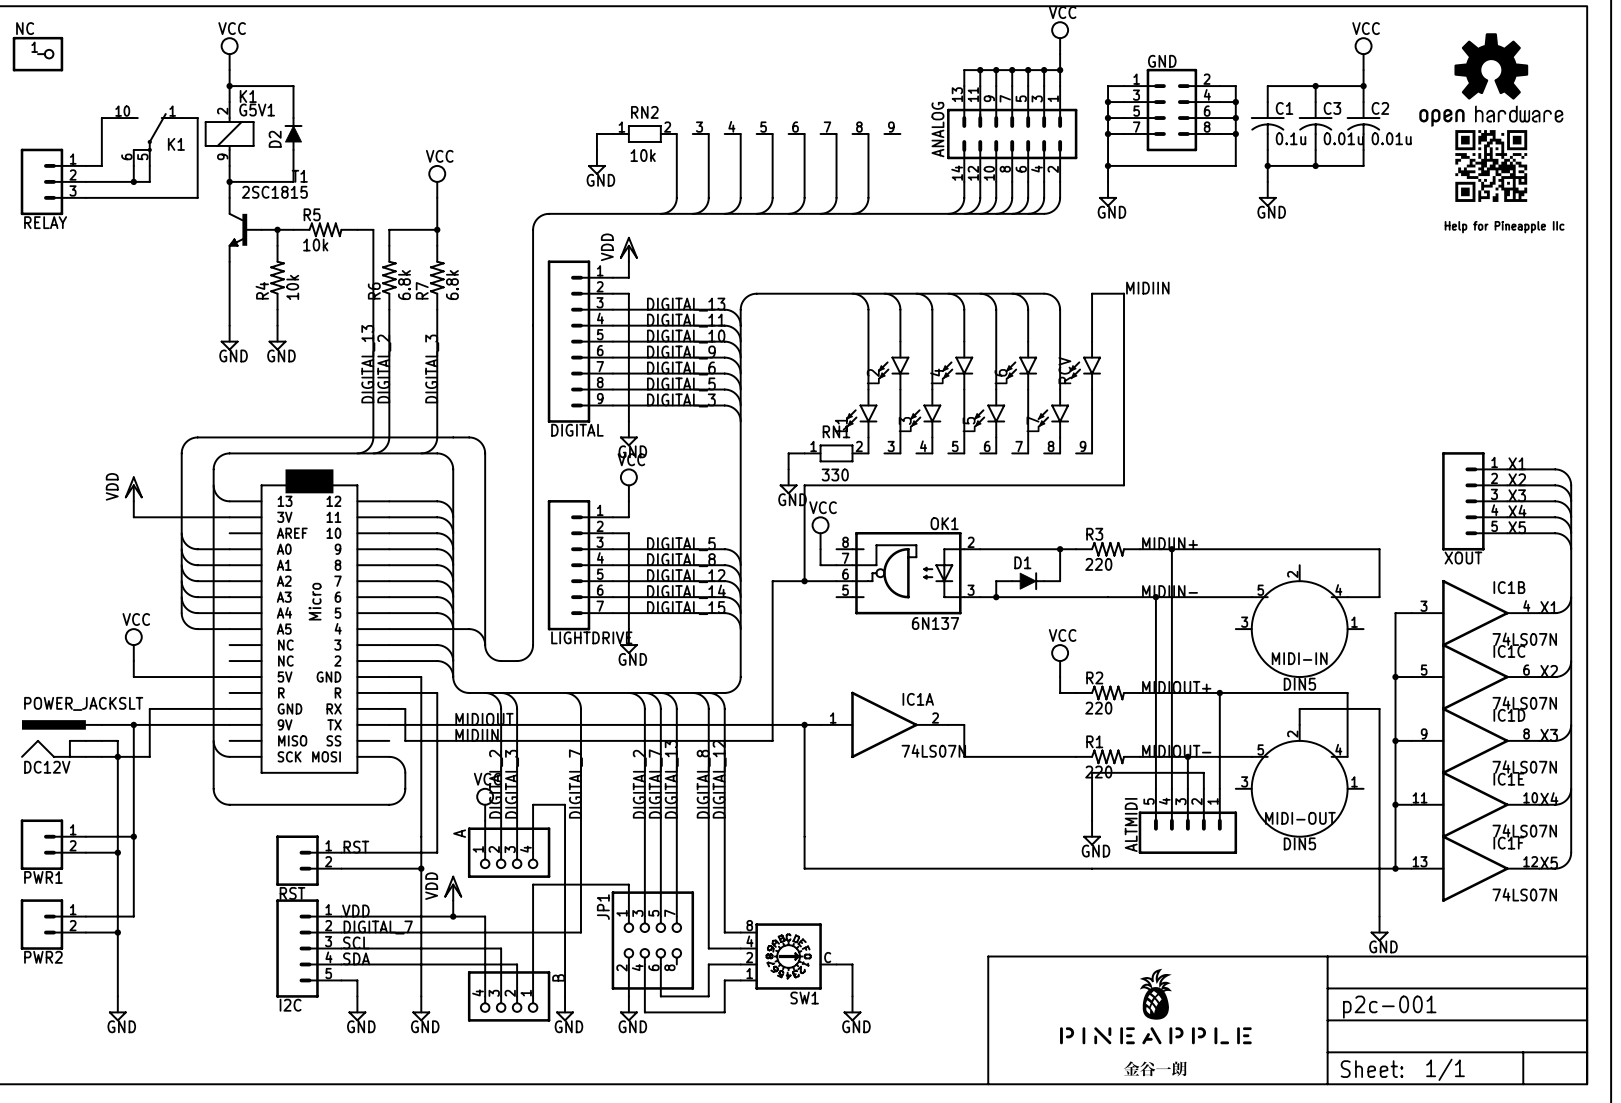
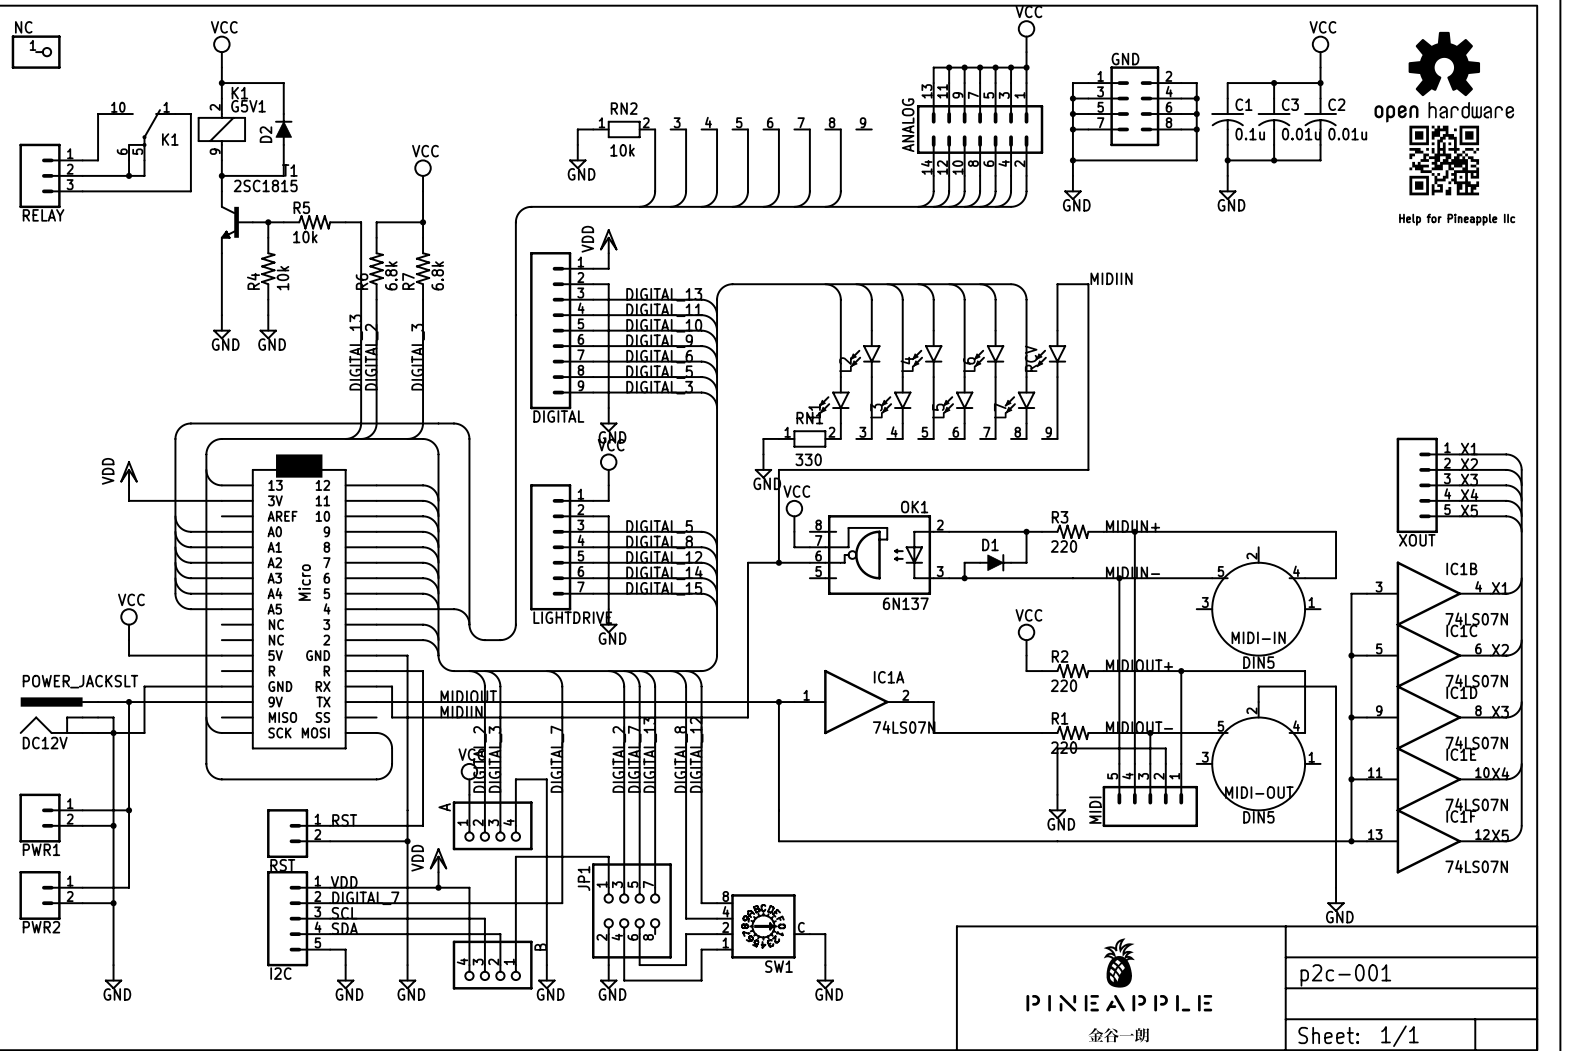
ALTMIDI name: ALTMIDI (1131, 825) -> MIDI (1095, 810)

